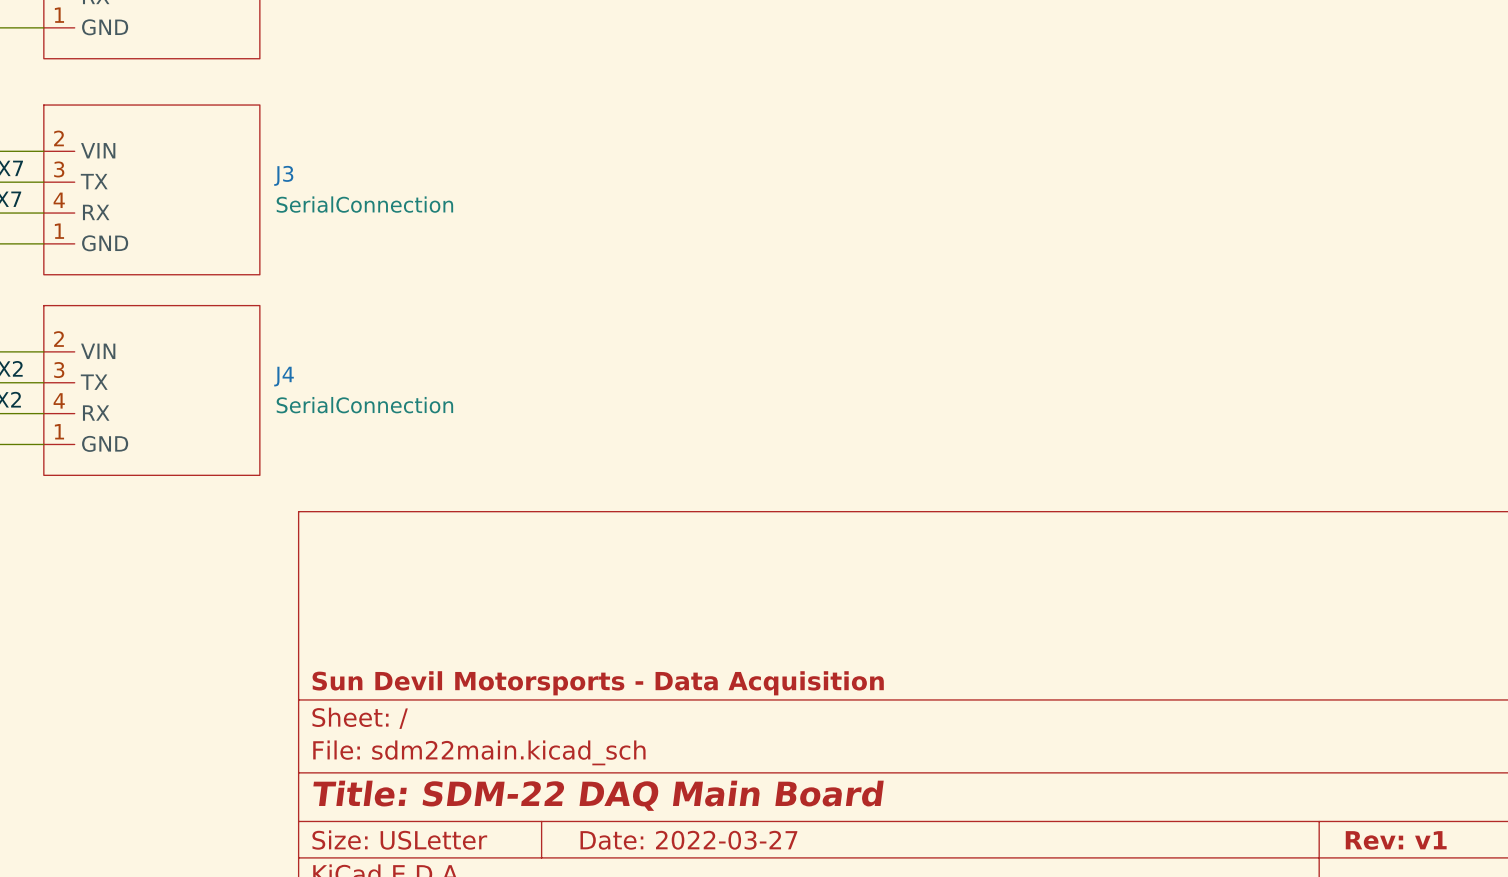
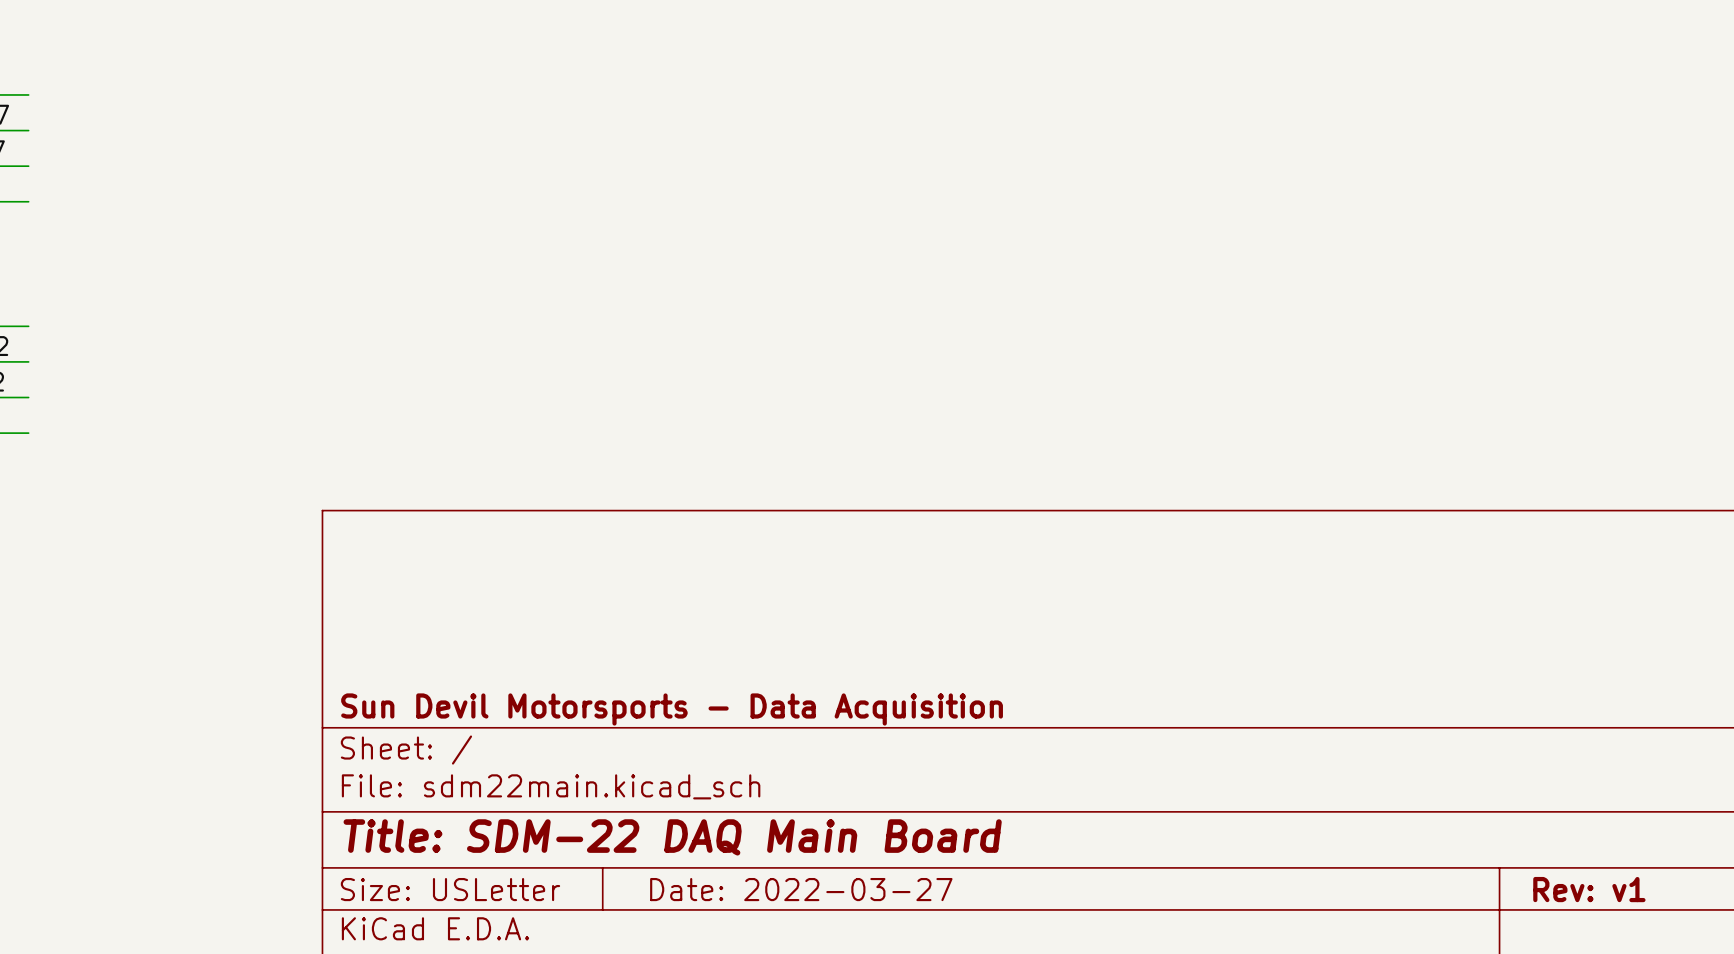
J3: SerialConnection (151, 189) -> none
J4: SerialConnection (151, 390) -> none

